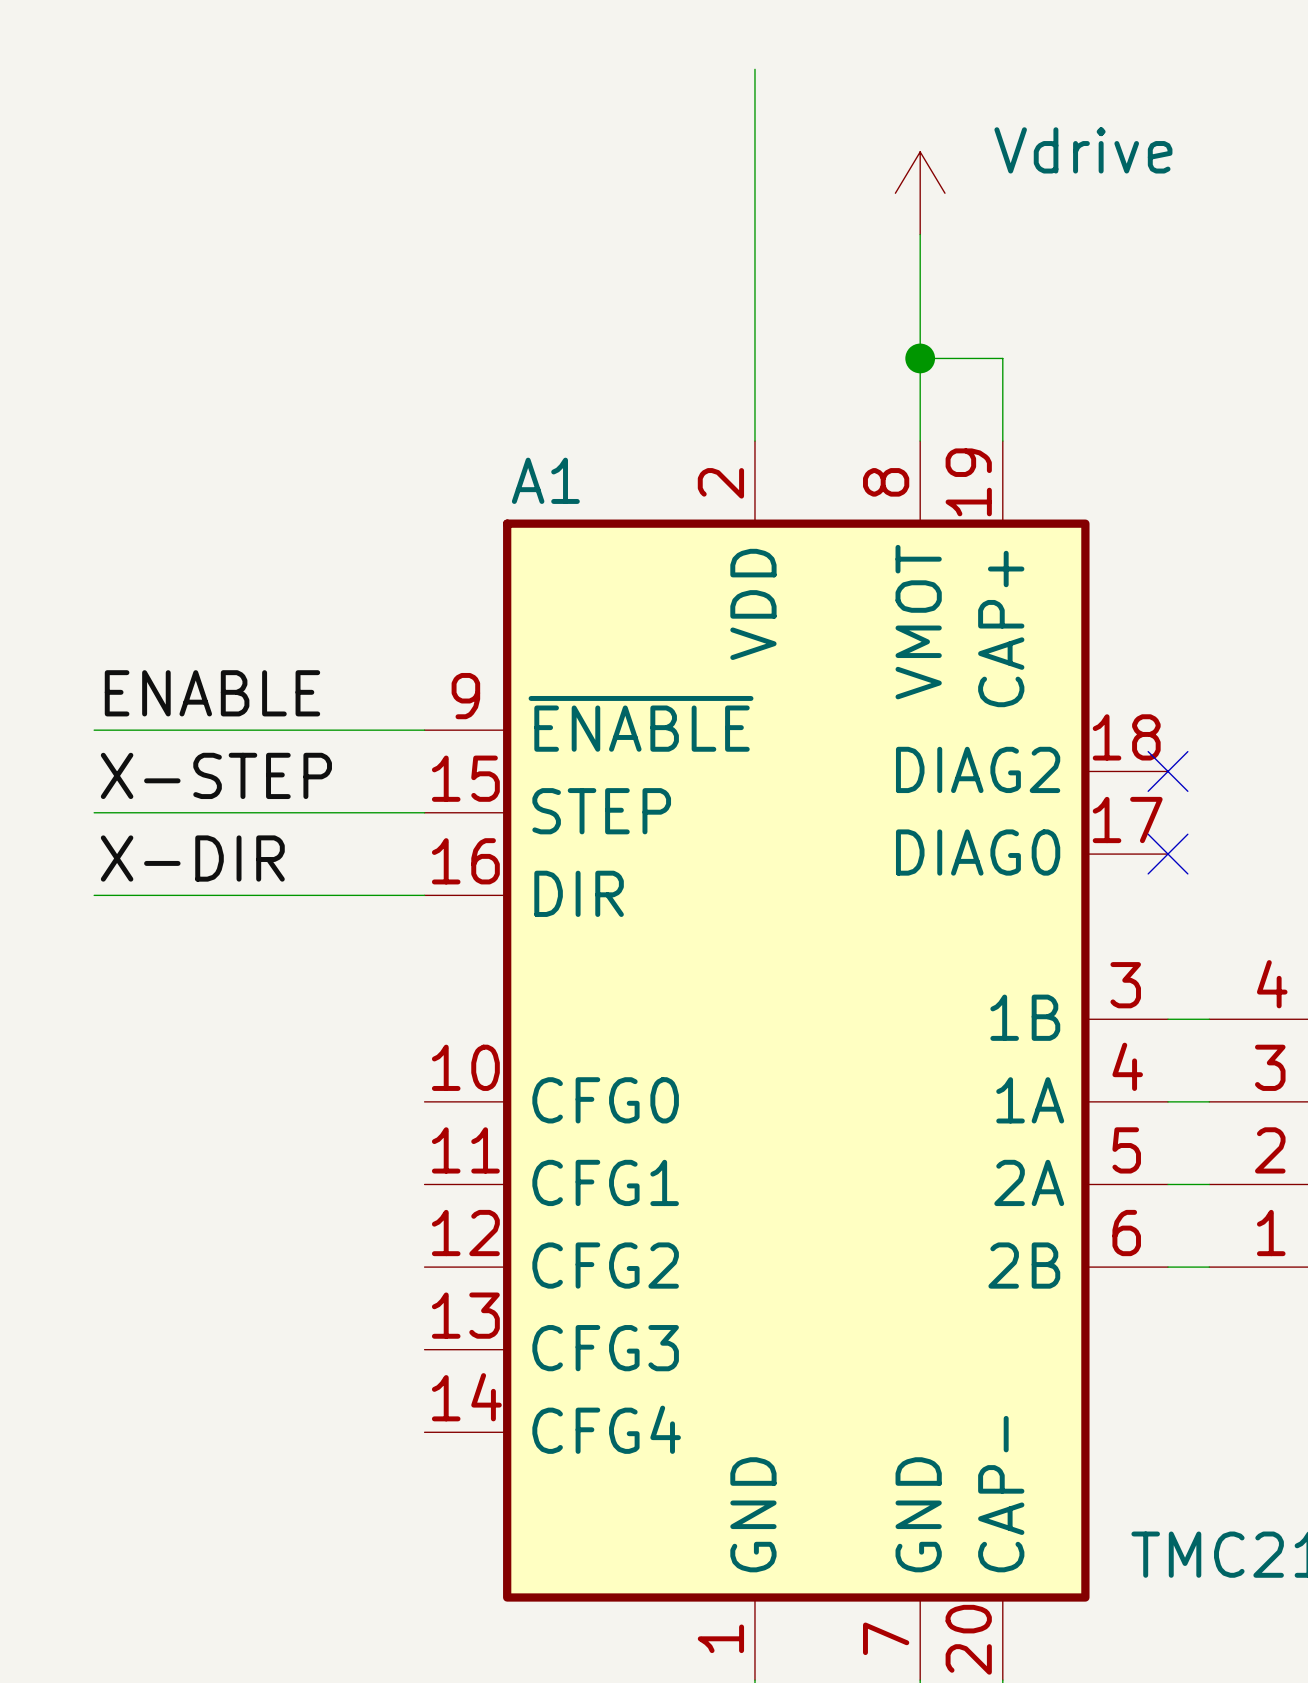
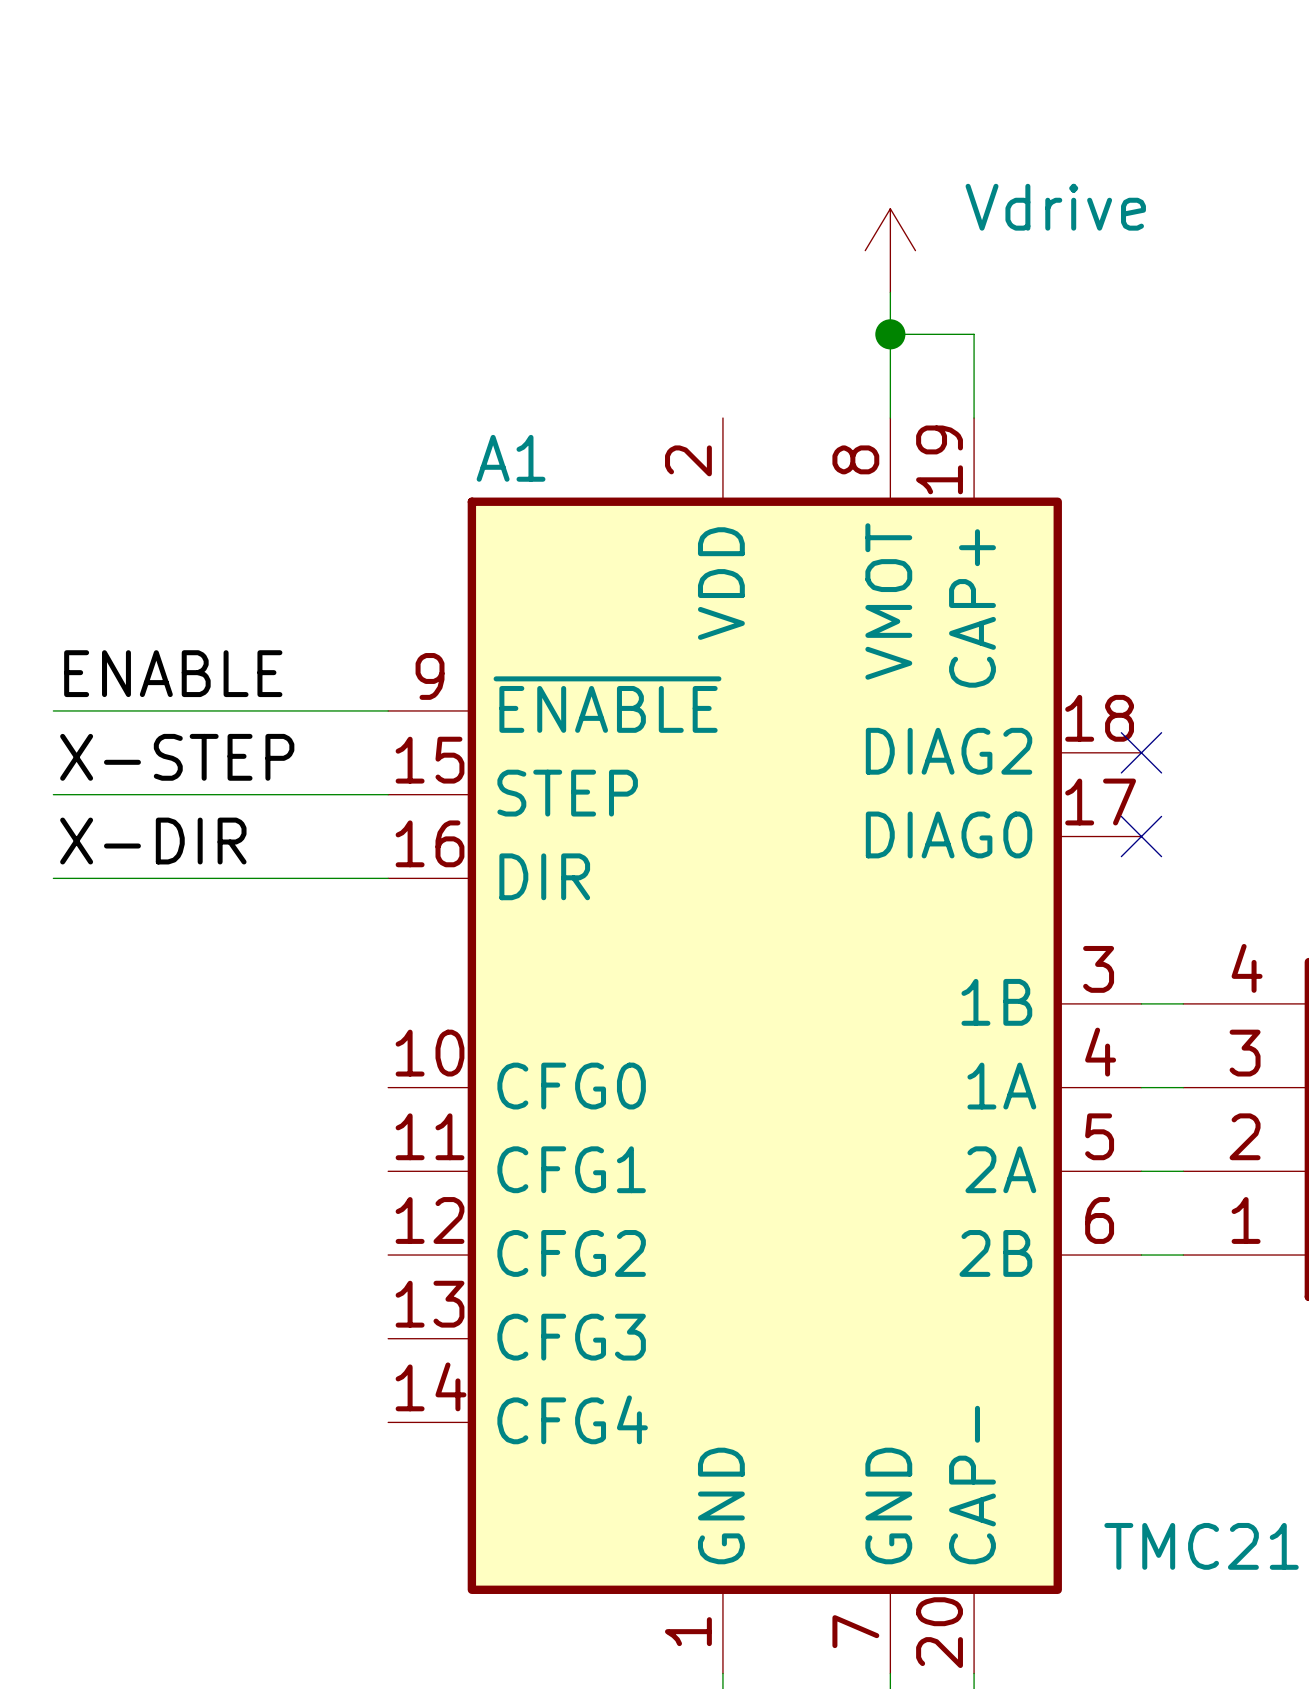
wire: (754, 69) (754, 441) -> none
power symbol position: Vdrive (920, 193) -> Vdrive (890, 250)

